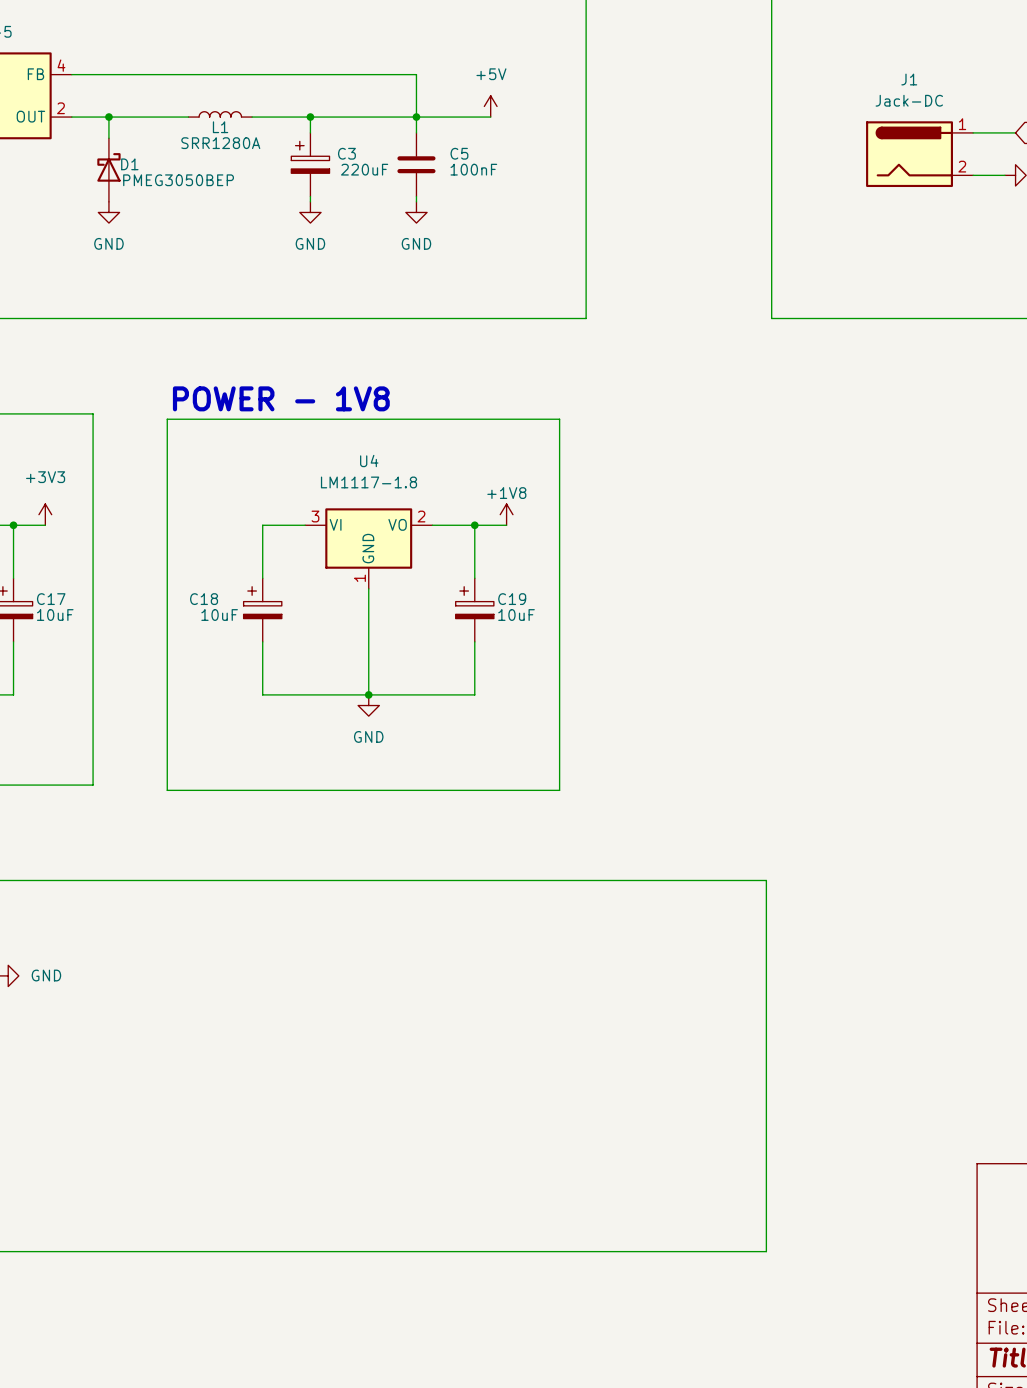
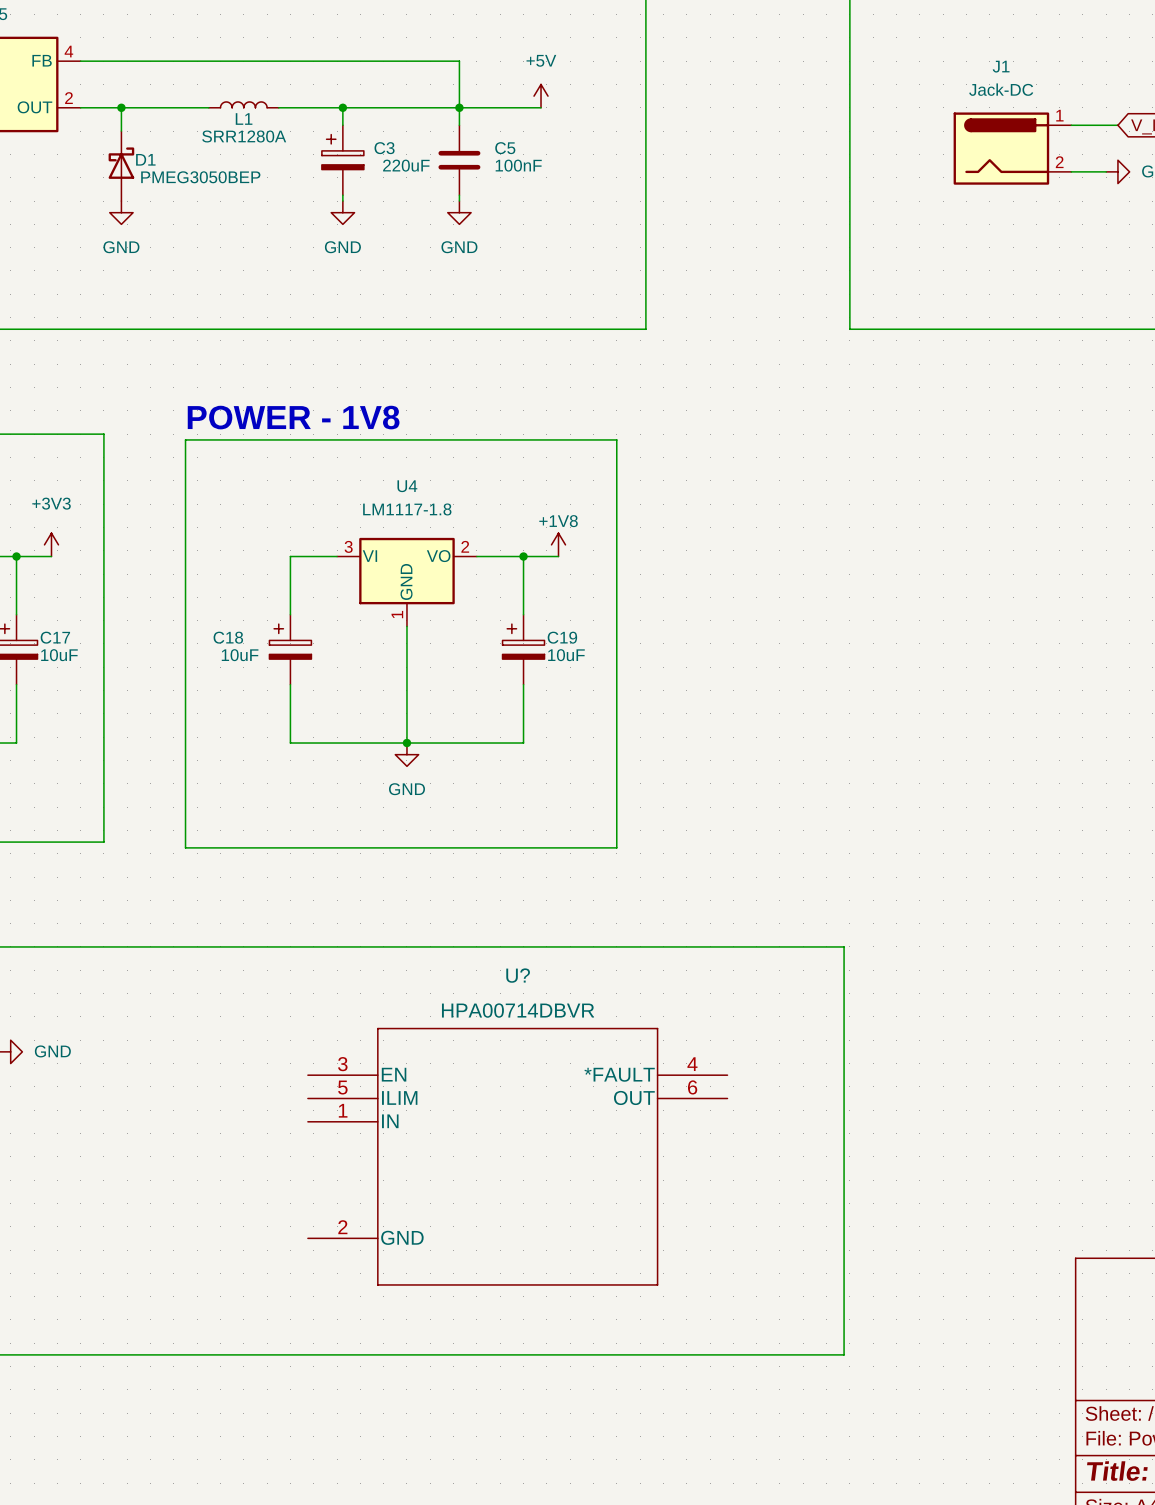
U?: none -> HPA00714DBVR (517, 1156)

